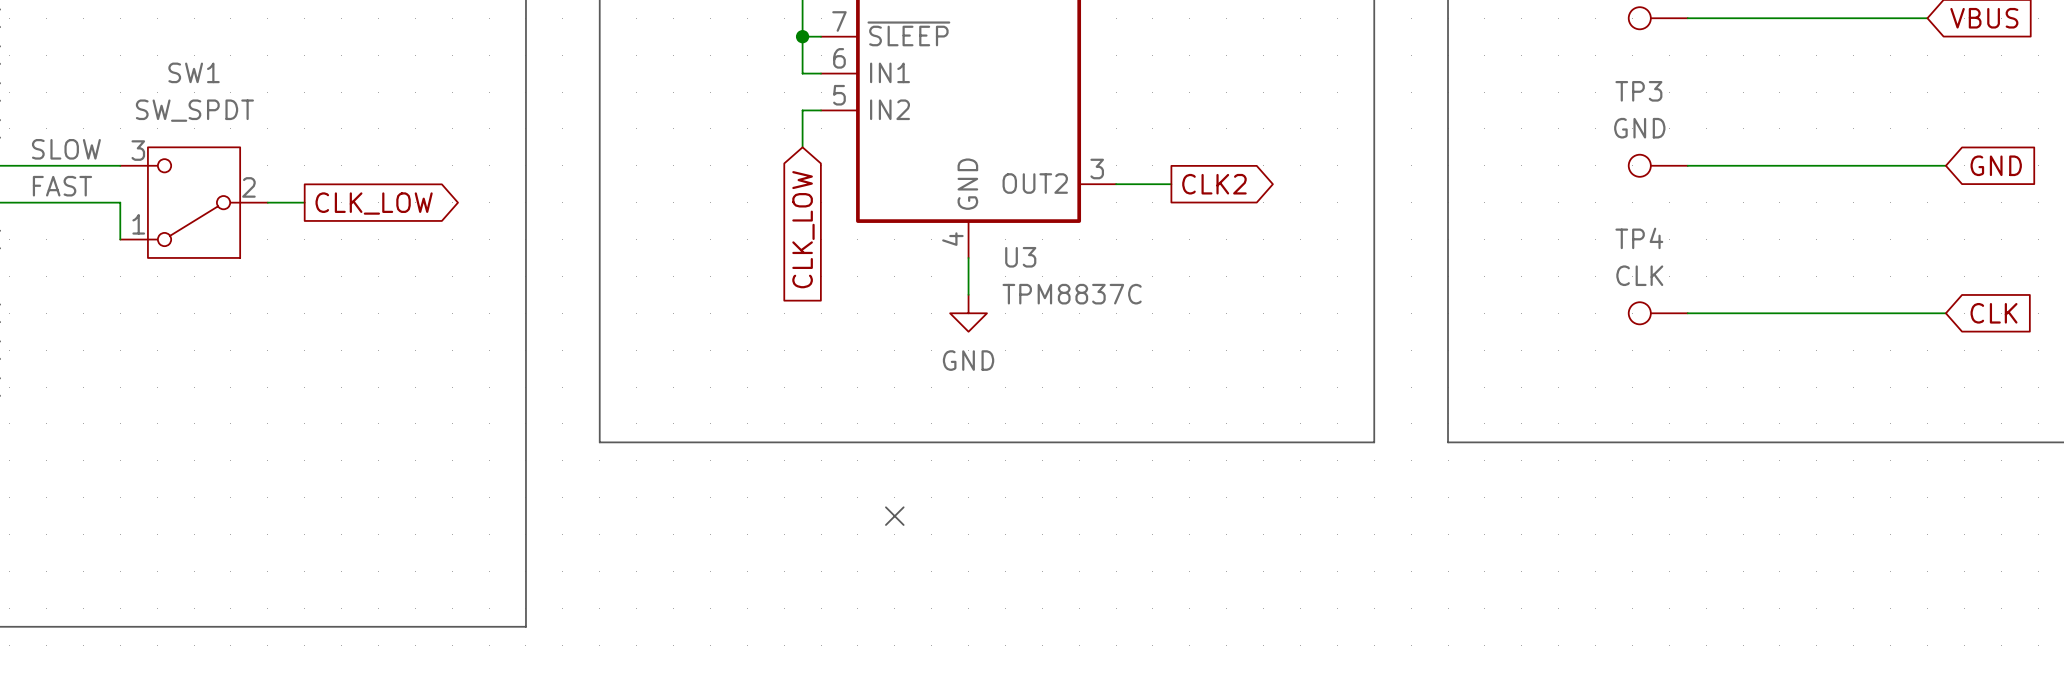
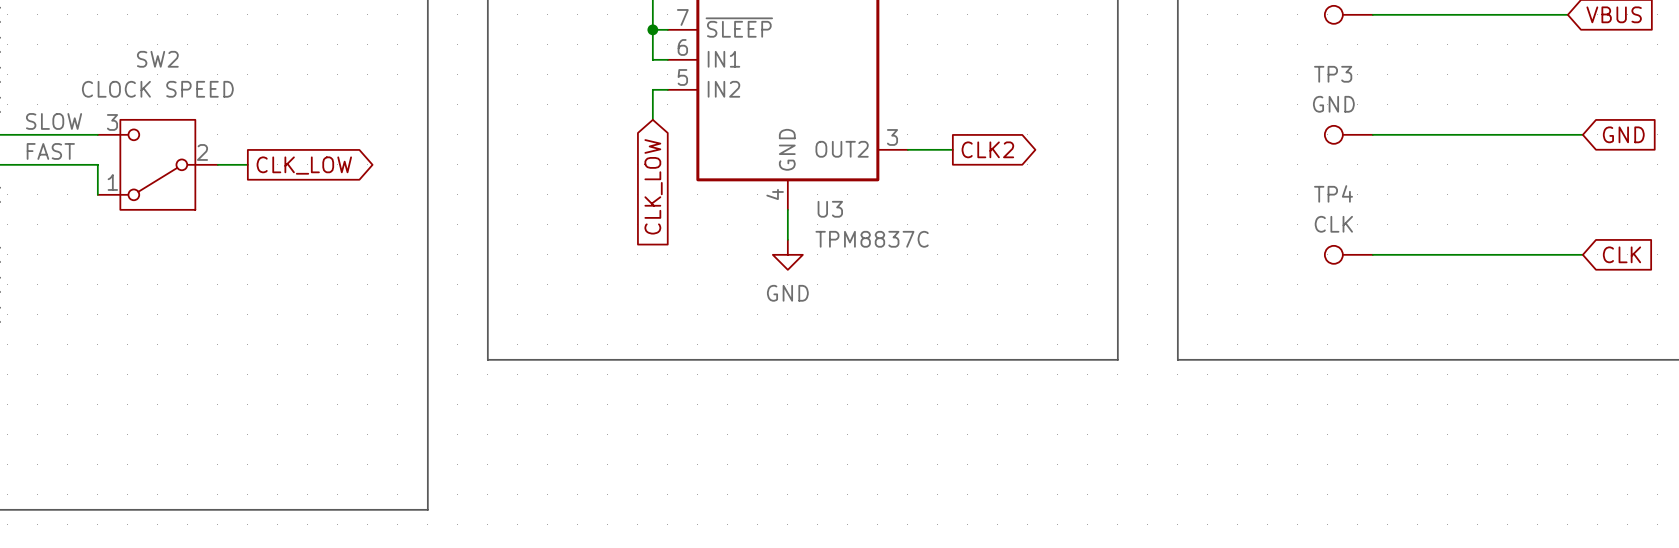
SW1 name: SW1 (194, 72) -> SW2 (157, 59)
SW1 value: SW_SPDT (194, 110) -> CLOCK SPEED (157, 89)
no-connect mark: (894, 516) -> none

